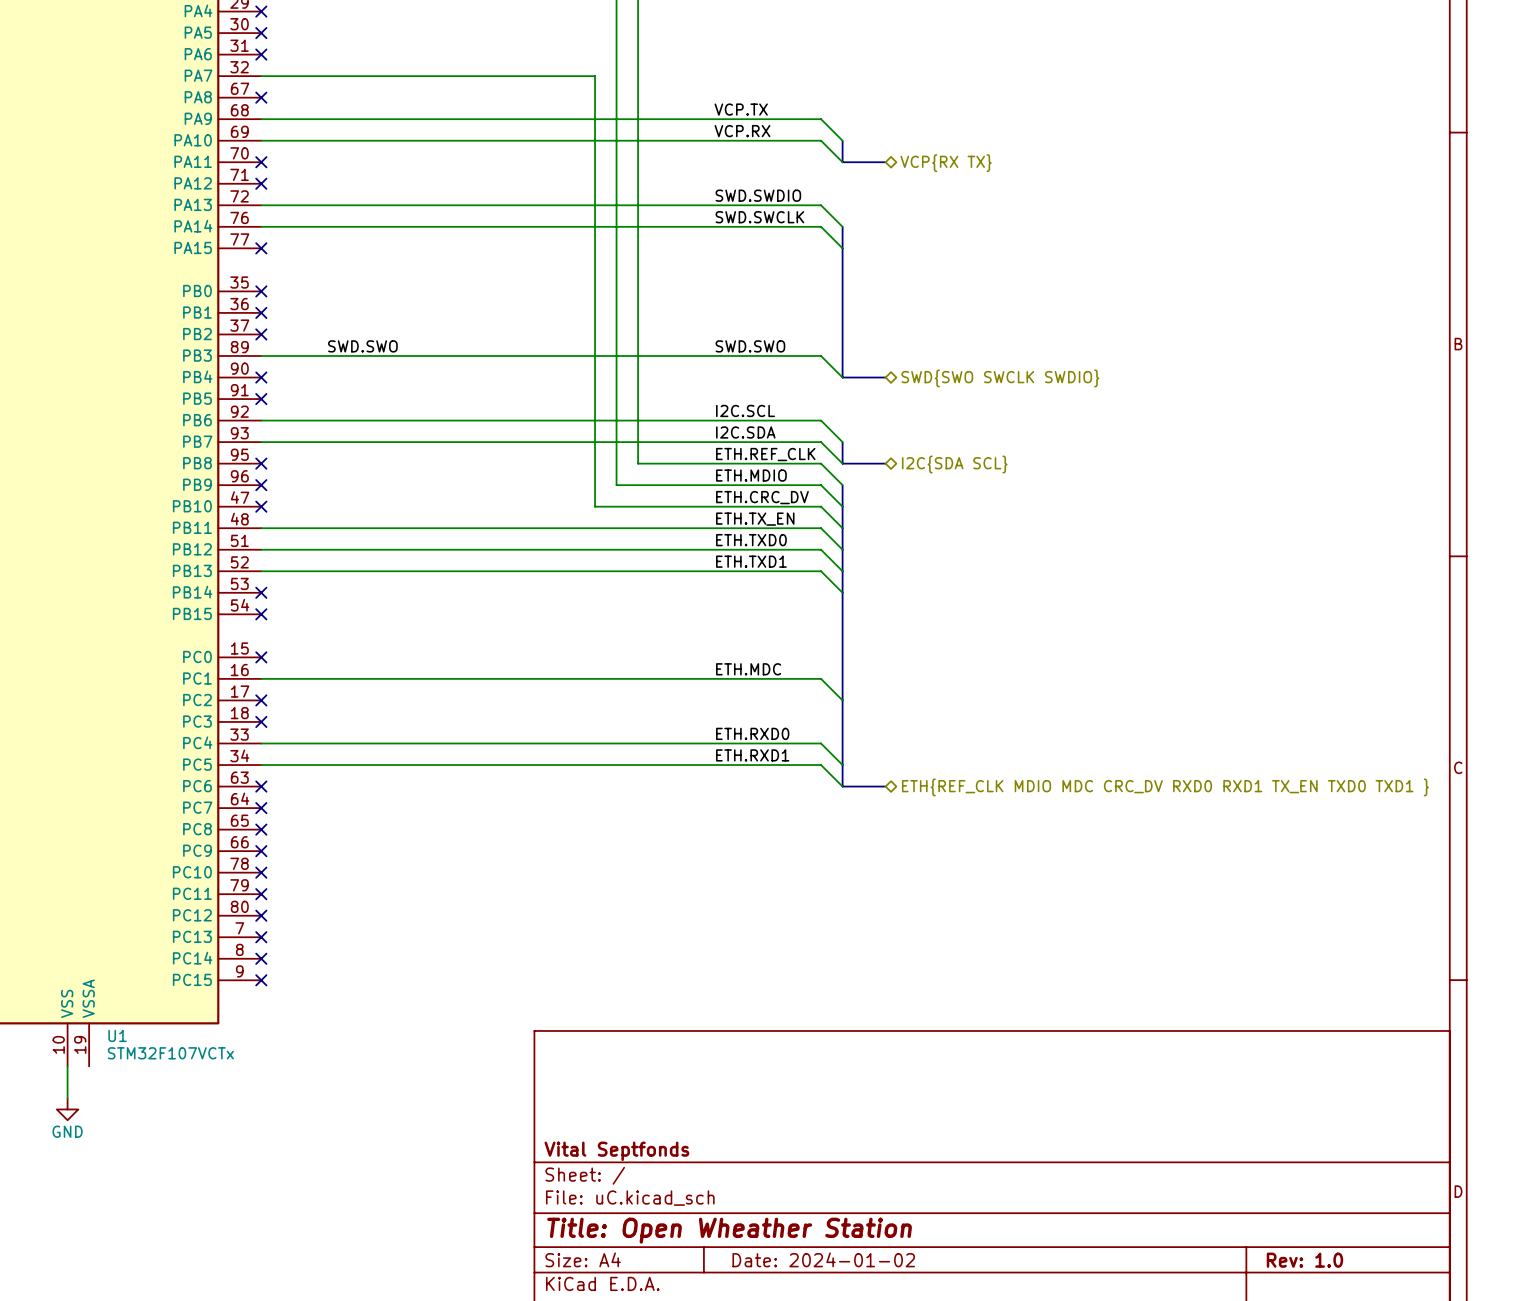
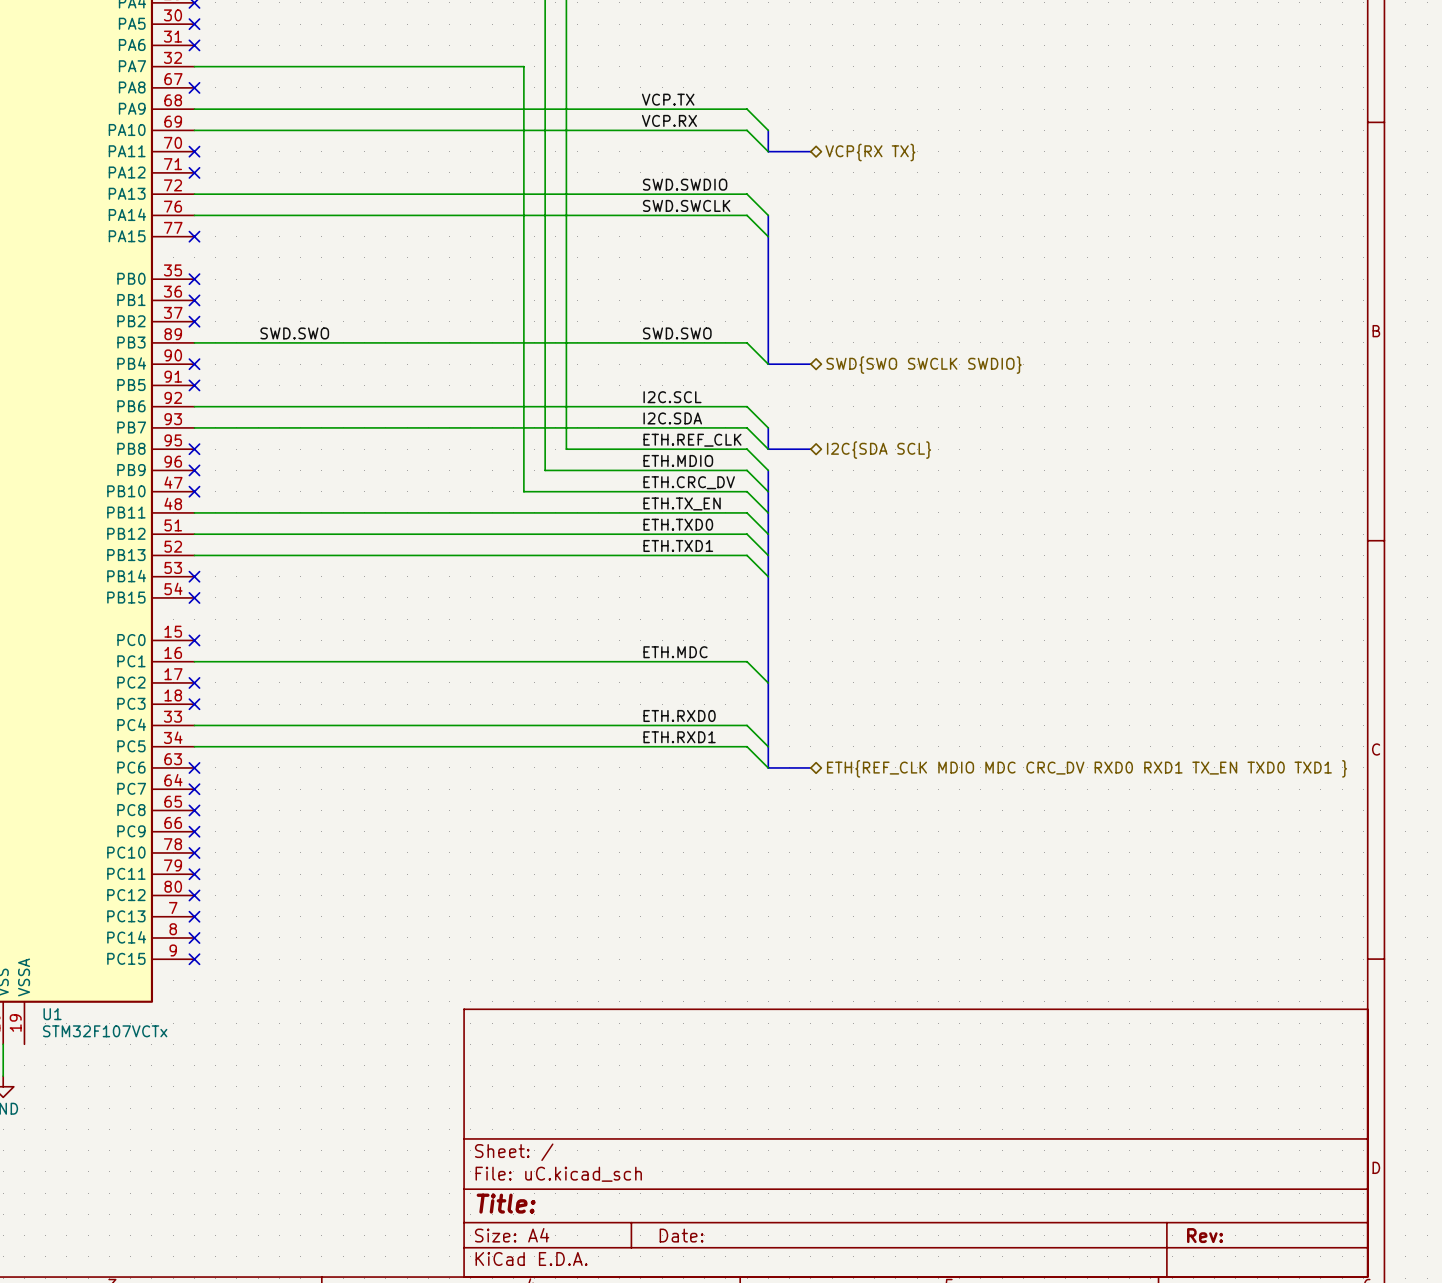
title block: Vital Septfonds (616, 1151) -> none
title block: Title: Open Wheather Station (729, 1230) -> Title: (506, 1203)
title block: Date: 2024-01-02 (823, 1259) -> Date: (681, 1235)
title block: Rev: 1.0 (1304, 1260) -> Rev: (1205, 1235)

